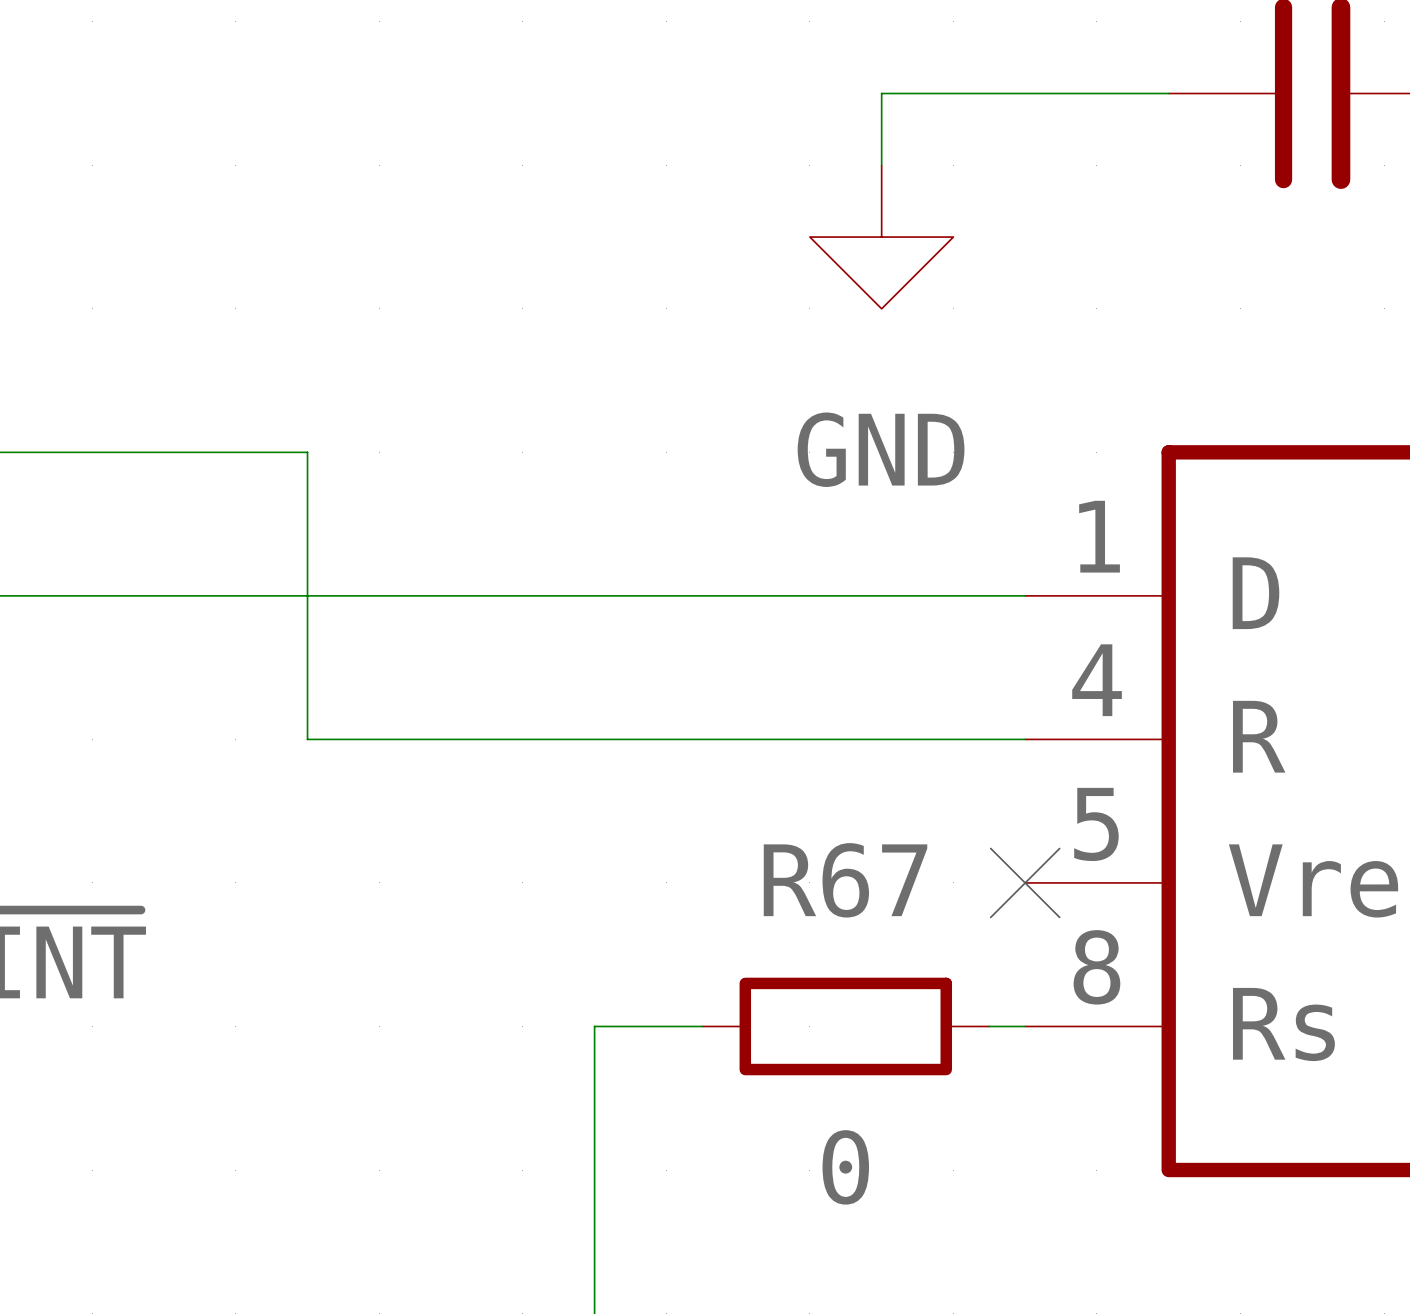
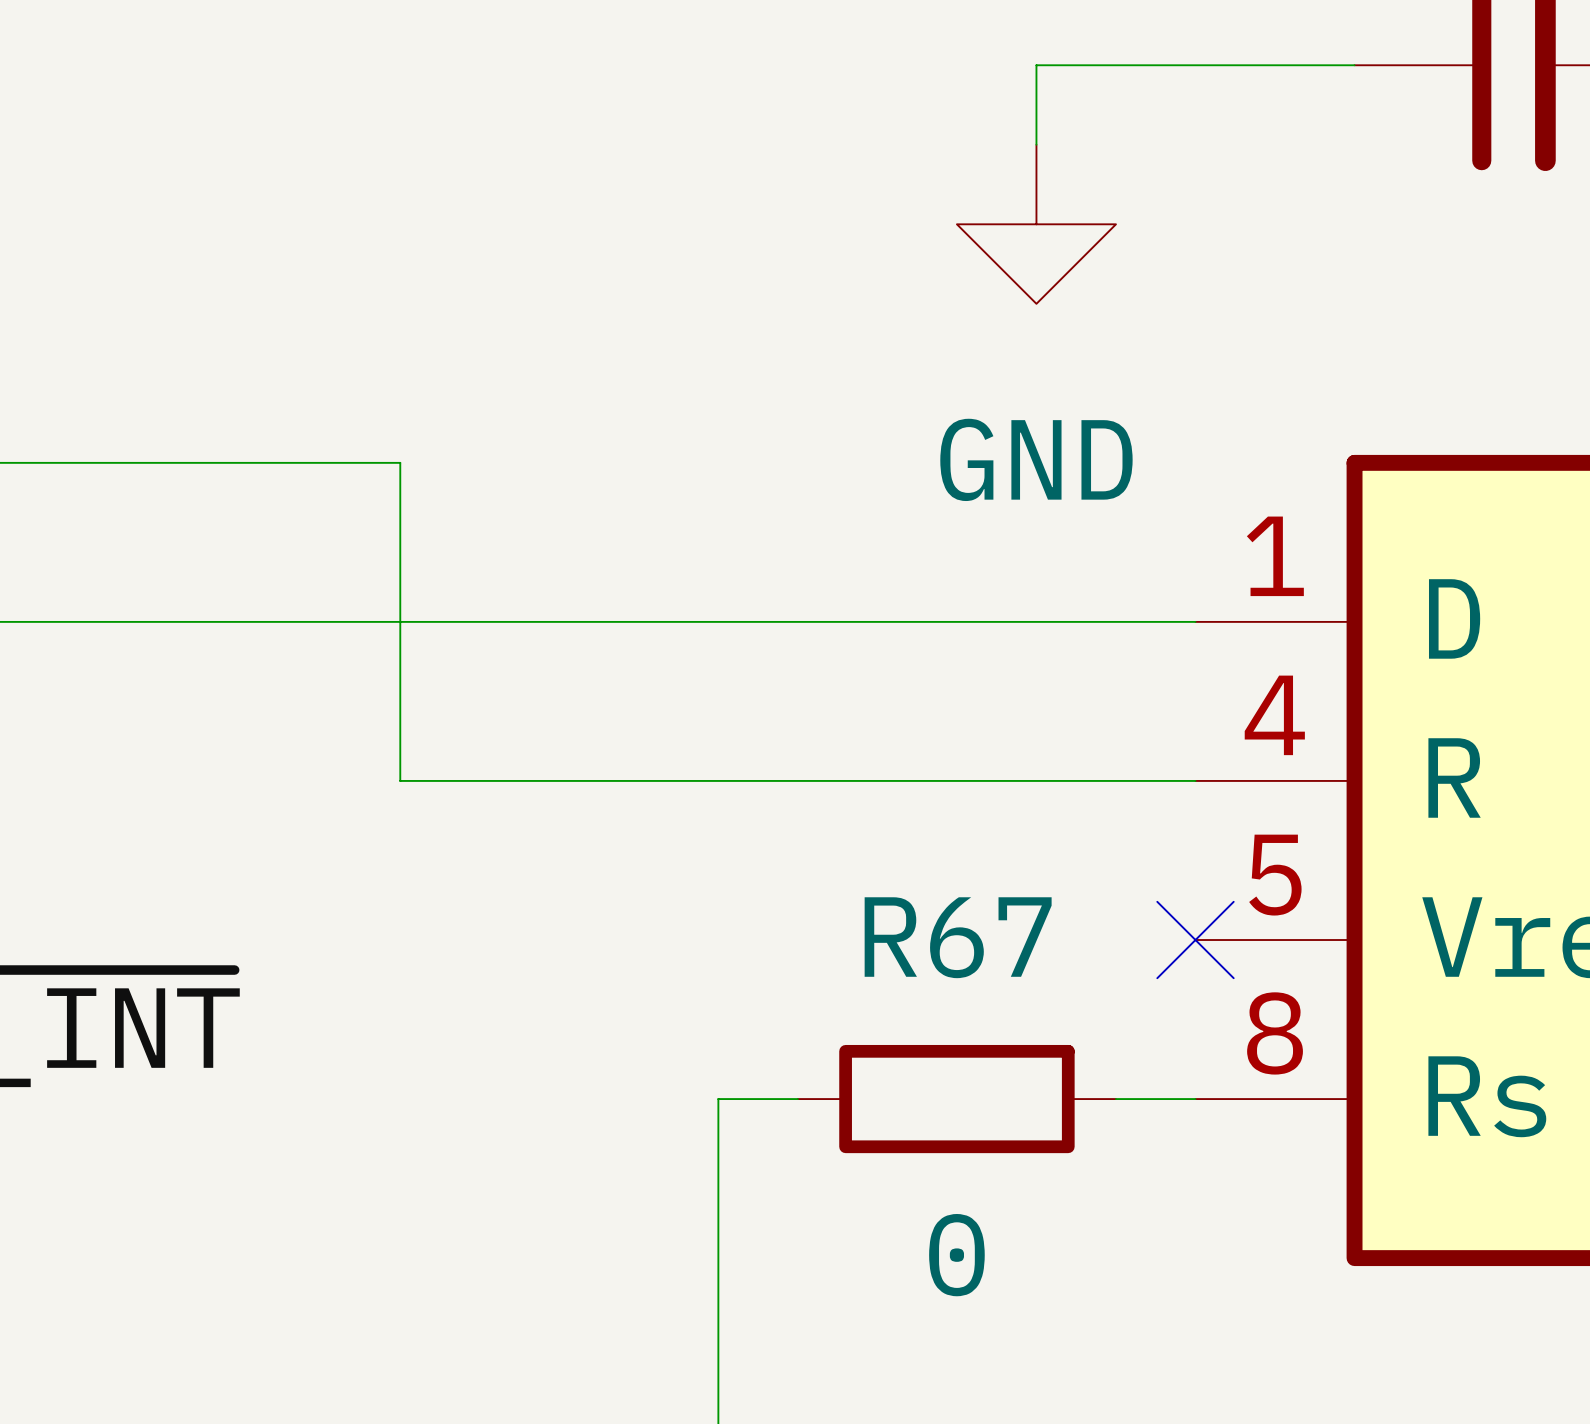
R67 position: (845, 1026) -> (956, 1099)

